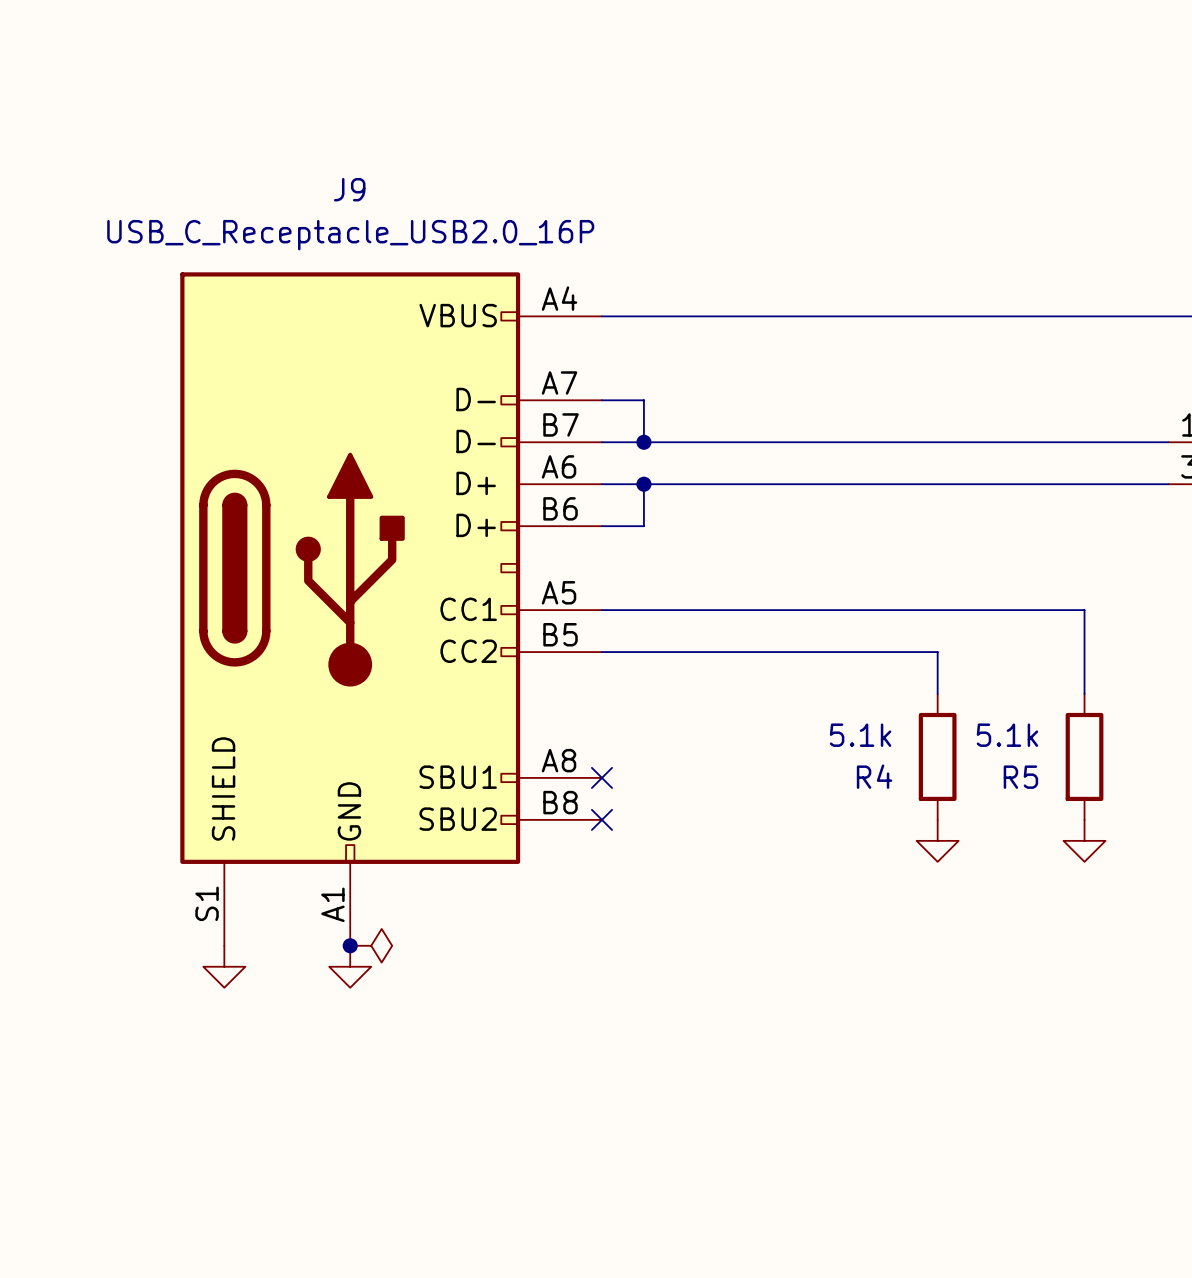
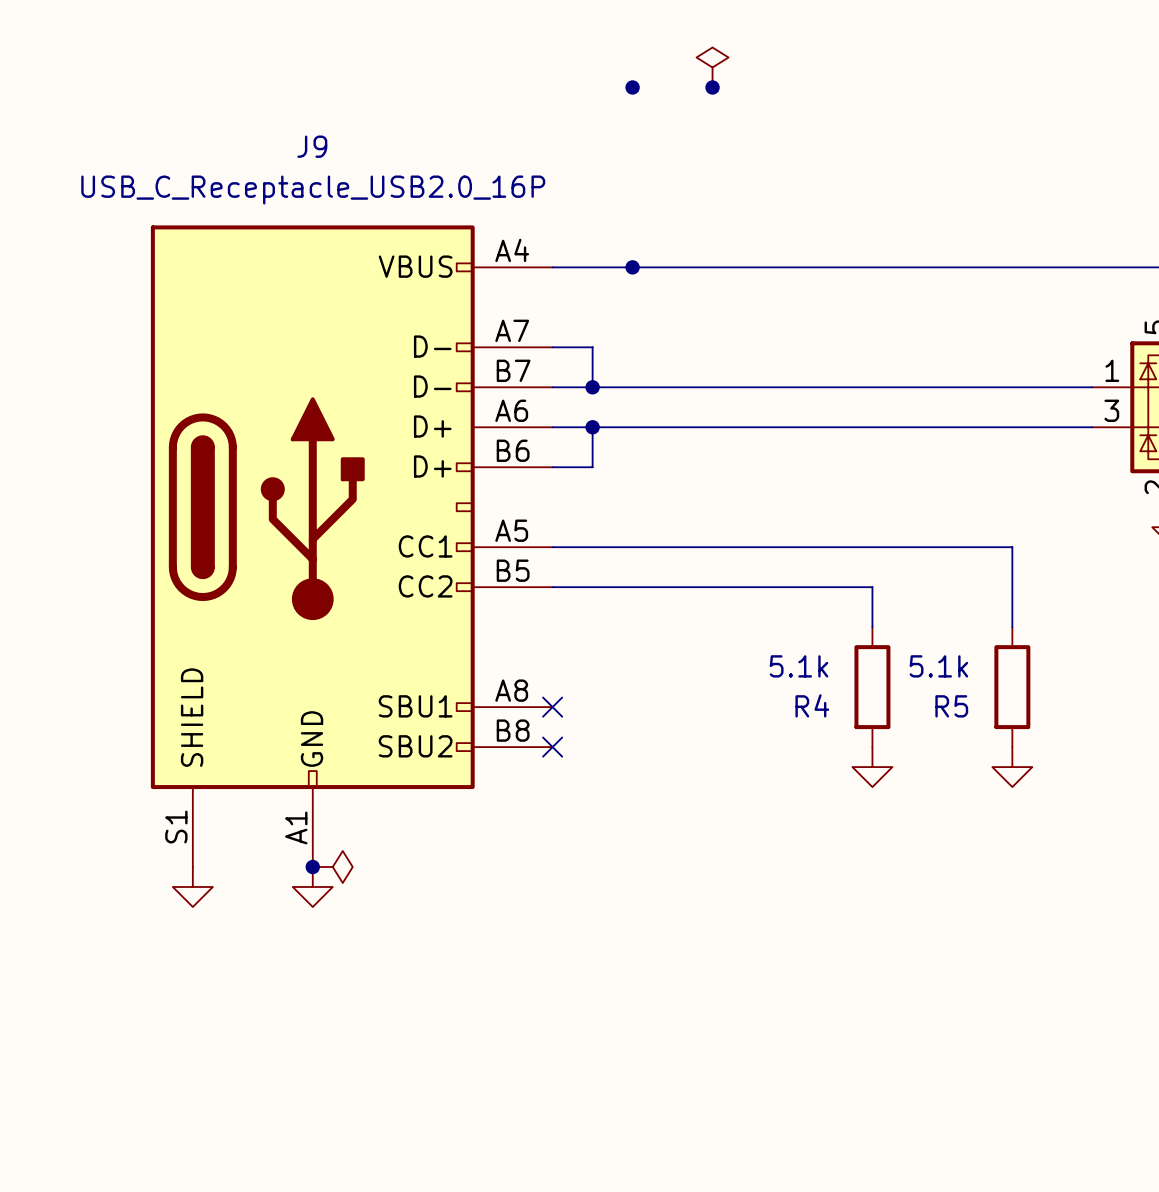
power symbol: none -> (712, 67)
junction: none -> (632, 87)
junction: none -> (712, 87)
junction: none -> (632, 267)

